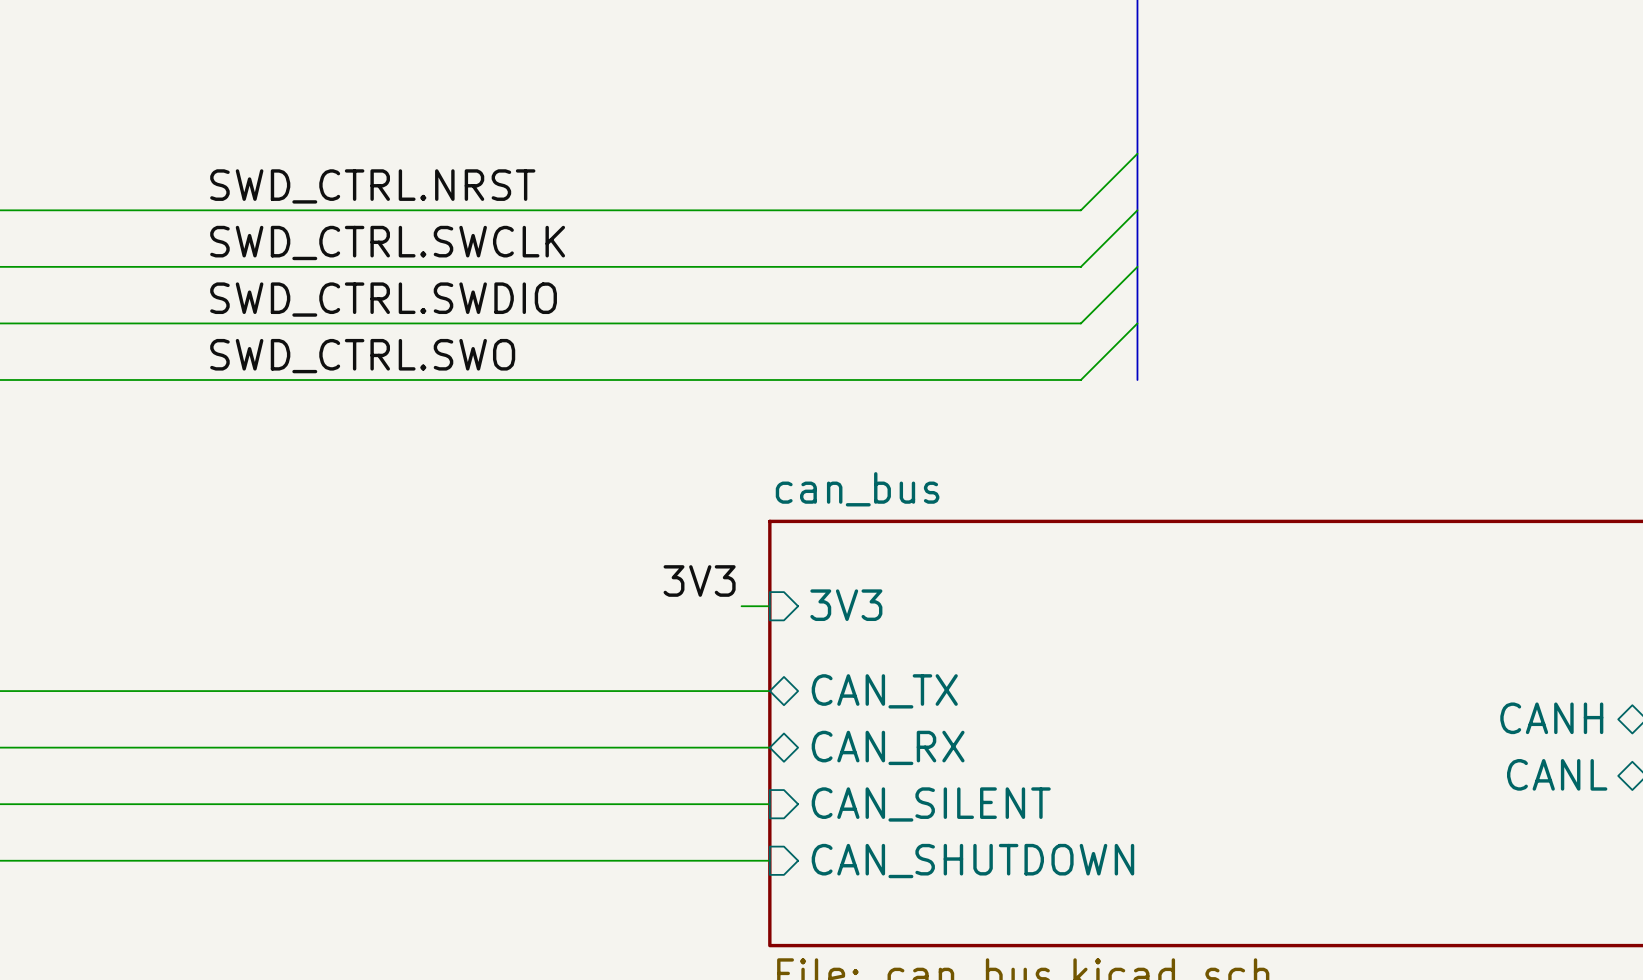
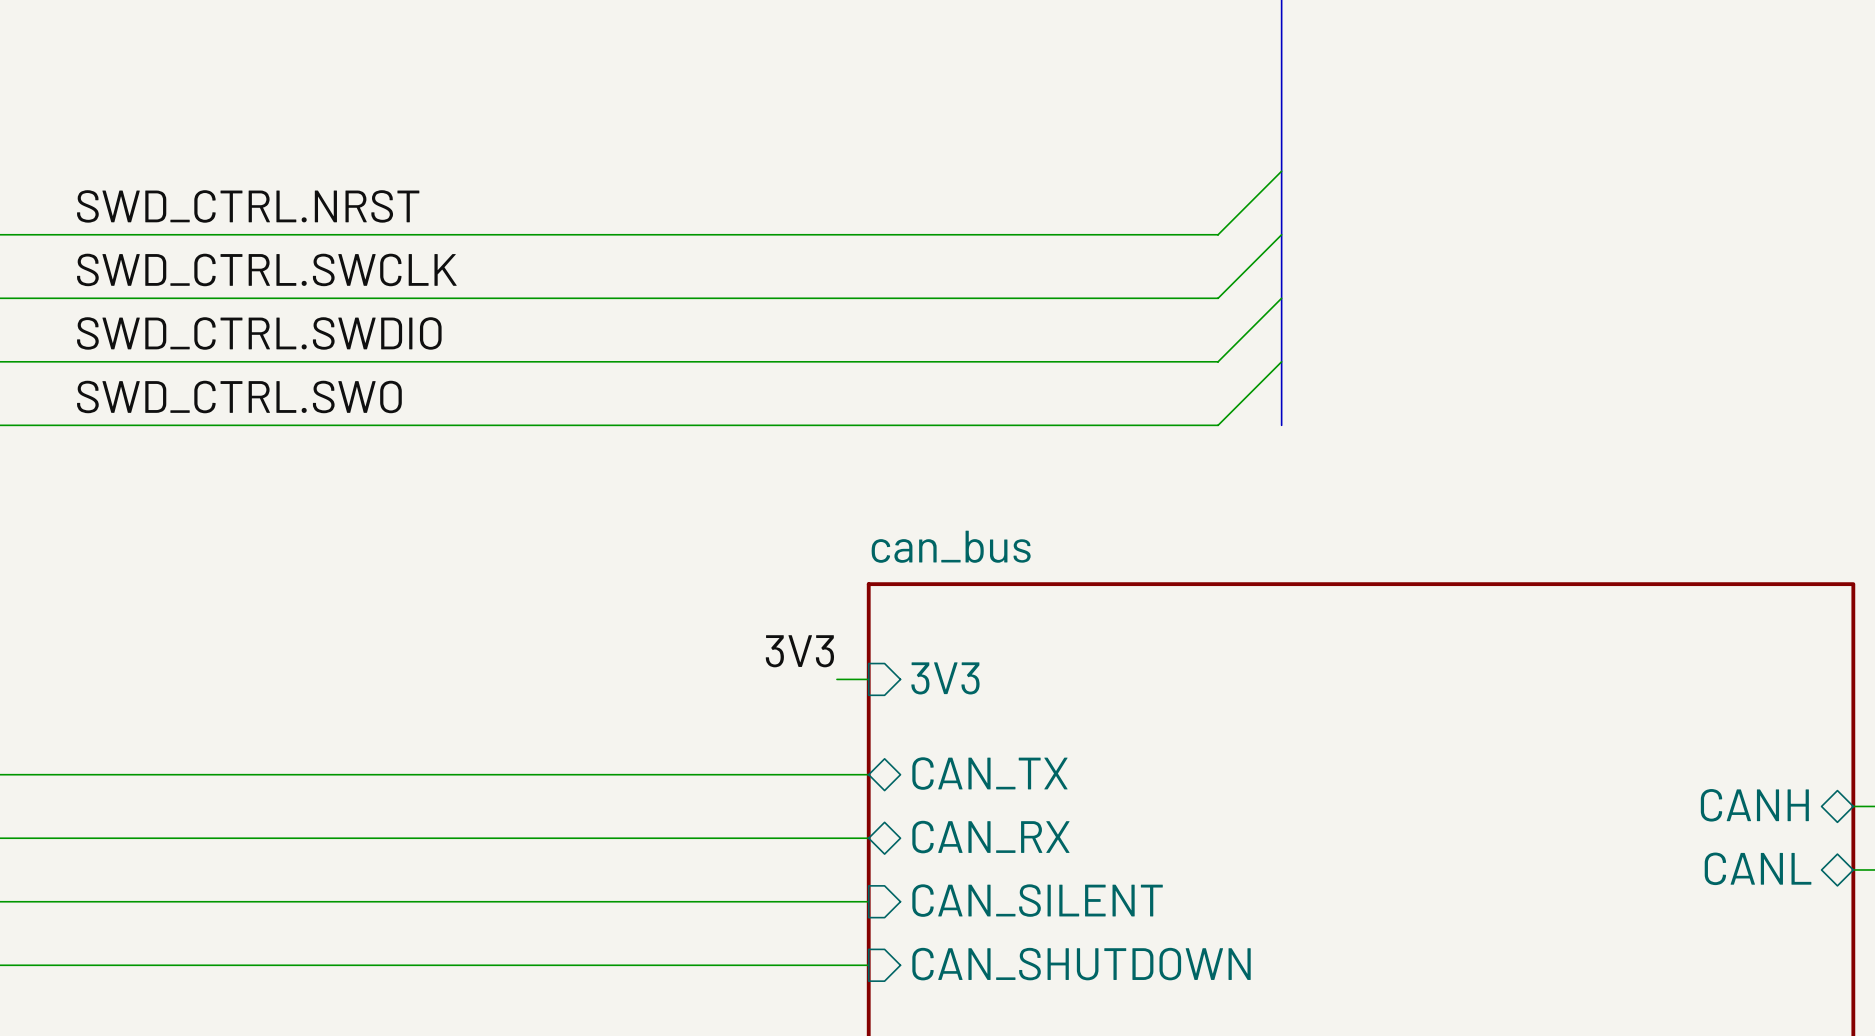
label position: SWD_CTRL.NRST (372, 186) -> SWD_CTRL.NRST (248, 206)
label position: SWD_CTRL.SWCLK (387, 242) -> SWD_CTRL.SWCLK (266, 269)
label position: SWD_CTRL.SWDIO (383, 299) -> SWD_CTRL.SWDIO (259, 333)
label position: SWD_CTRL.SWO (362, 356) -> SWD_CTRL.SWO (239, 397)

